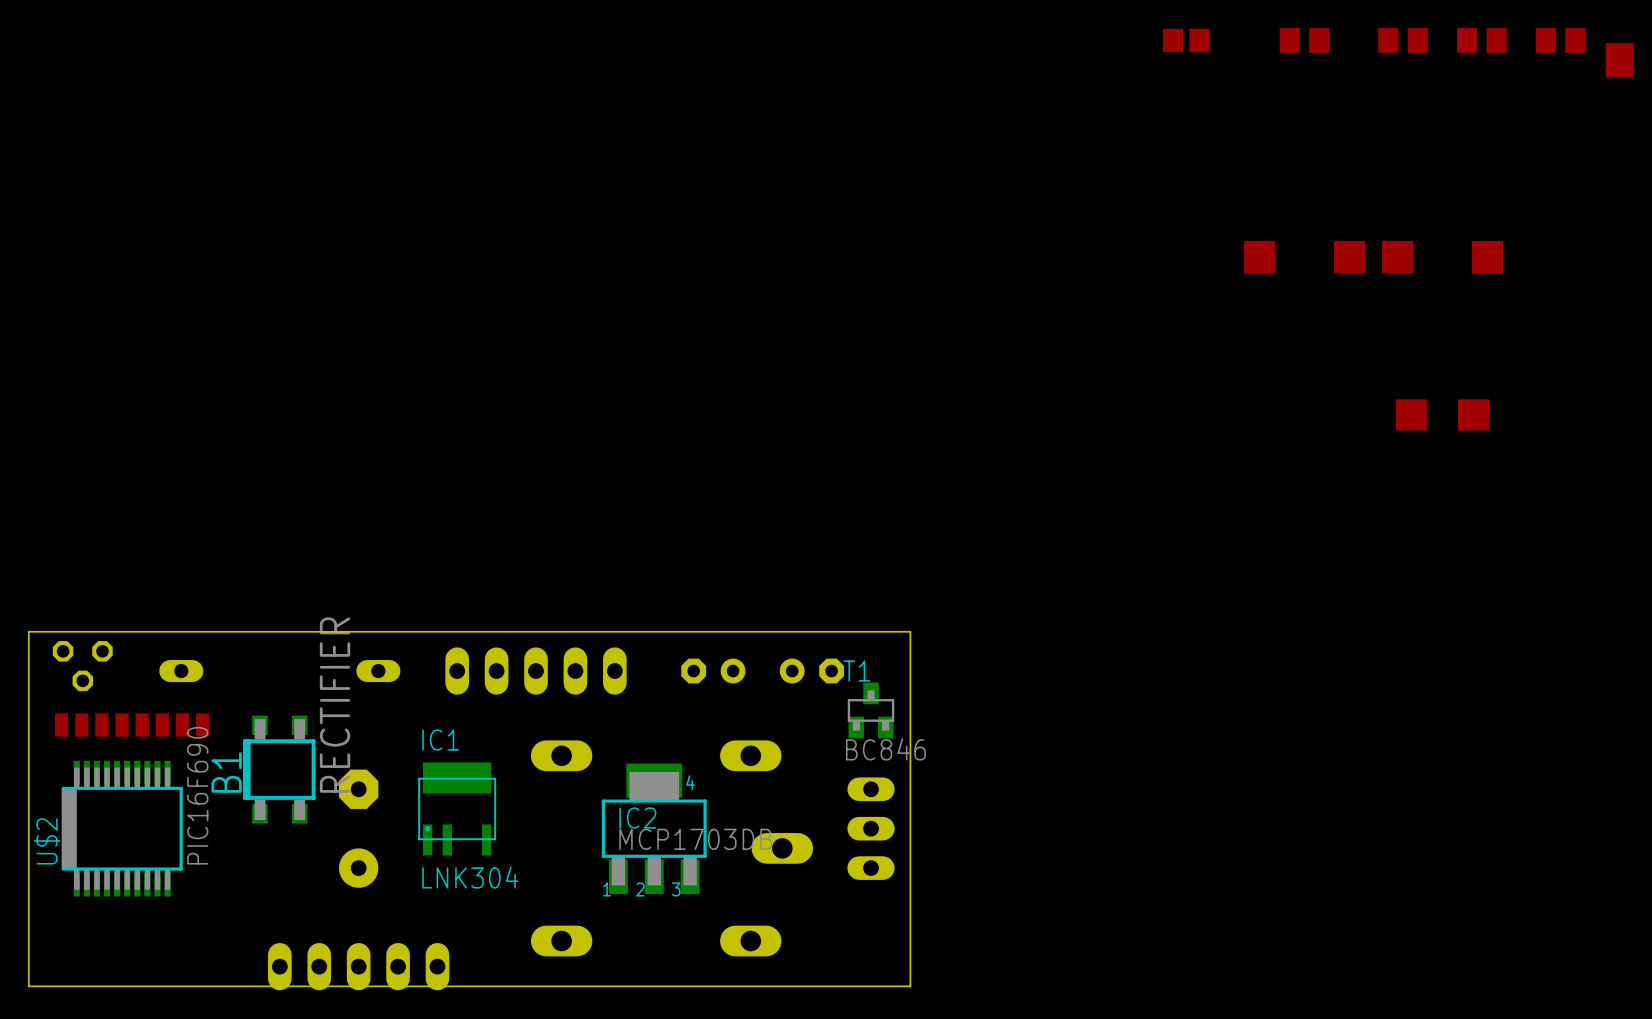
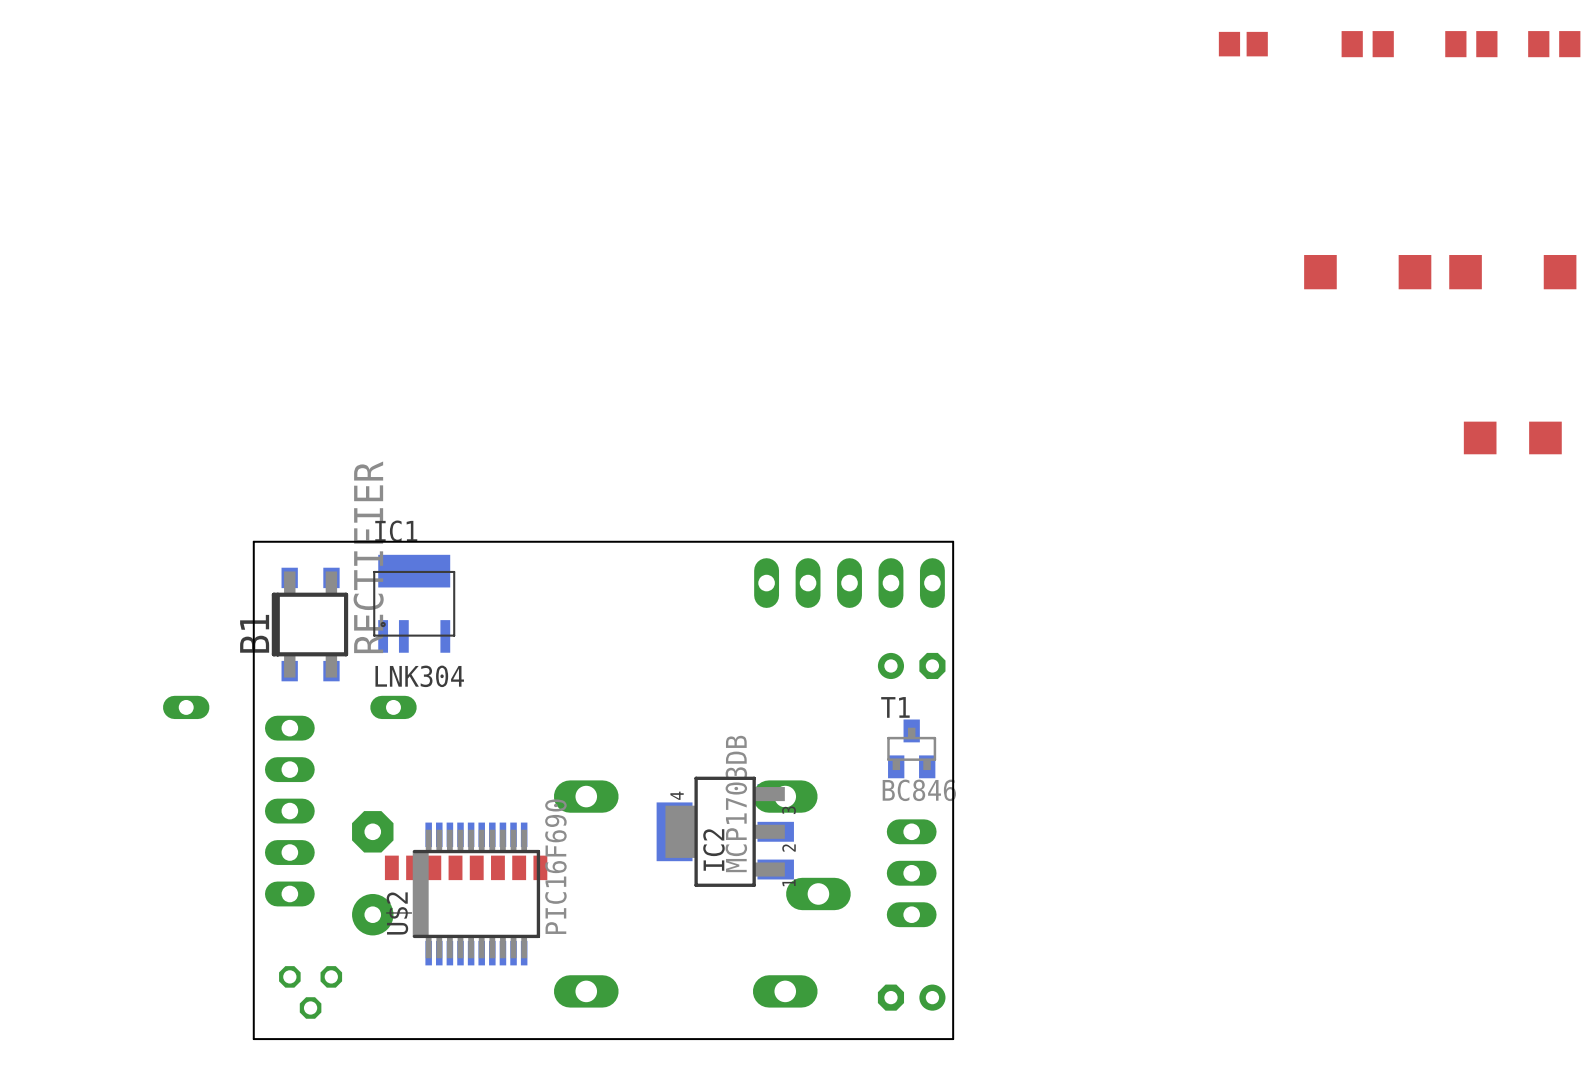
part: none -> (849, 583)
board edge: (910, 631) (28, 631) (28, 986) (245, 986) -> (953, 666) (953, 541) (253, 541) (253, 1039)
part position: (82, 666) -> (310, 992)
part: (536, 671) -> none
part: (713, 671) -> none
part position: (811, 671) -> (911, 665)
part position: (132, 725) -> (466, 867)
B1 position: (279, 769) -> (309, 624)
part: none -> (289, 811)
IC1 position: (457, 808) -> (414, 603)
U$2 position: (122, 828) -> (476, 893)
IC2 rotation: 0° (654, 828) -> 90° counterclockwise (725, 831)
part: none -> (911, 997)
part: (358, 966) -> none

